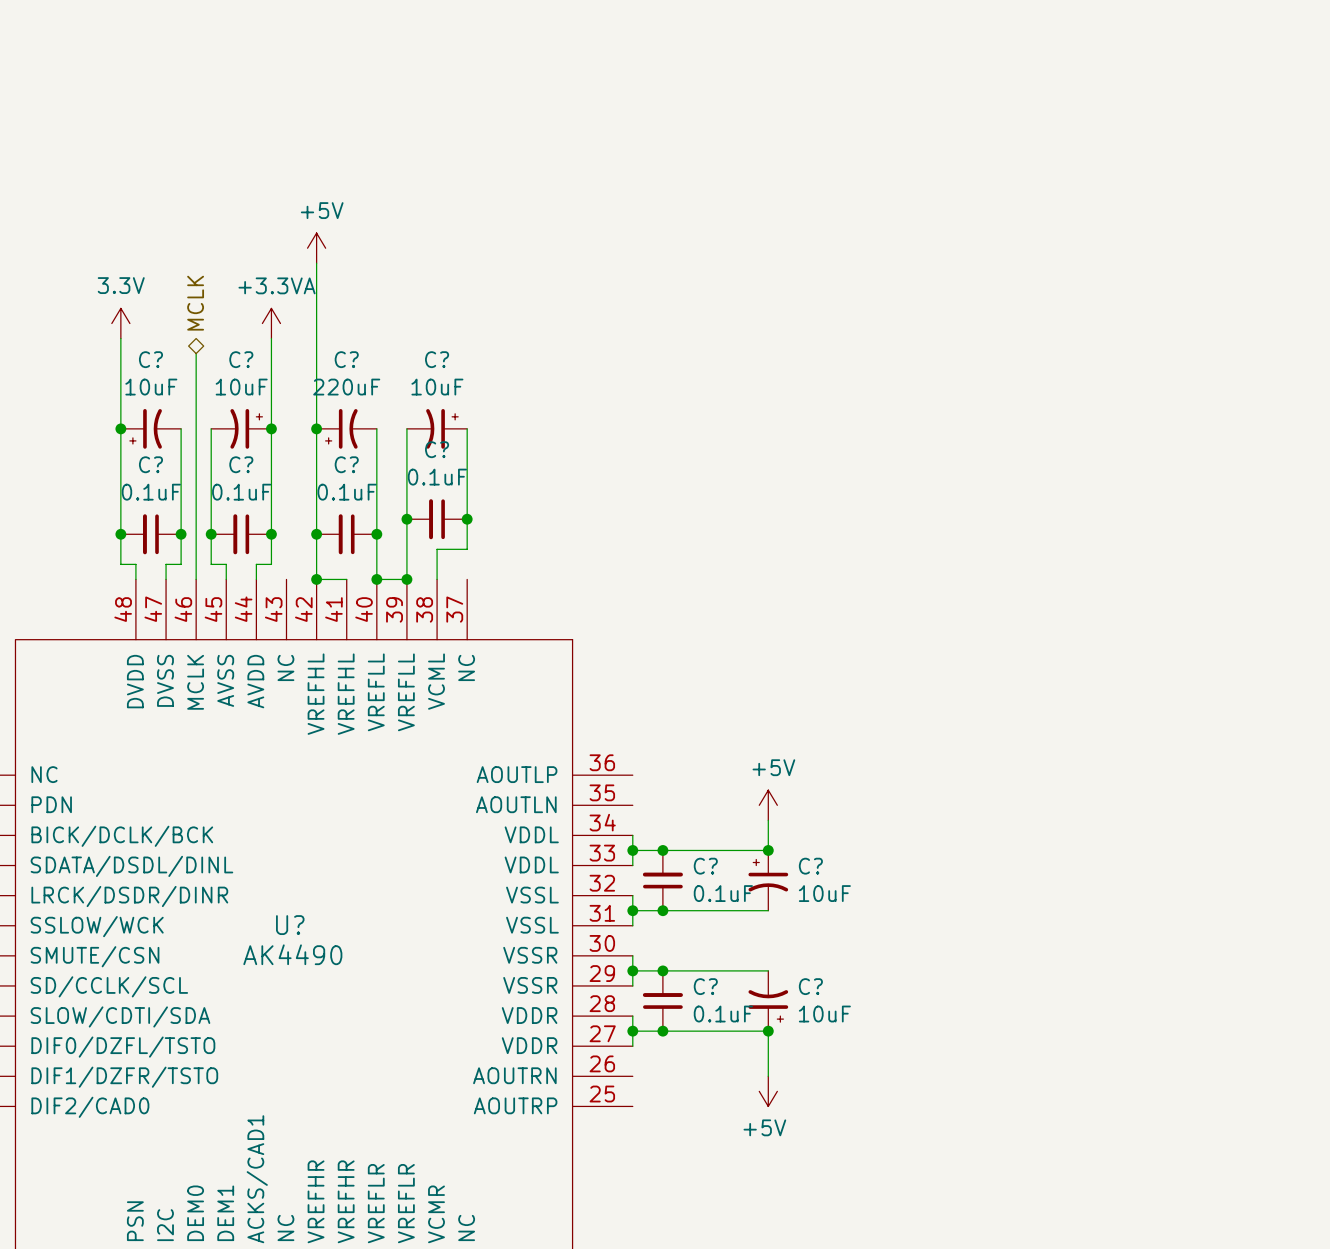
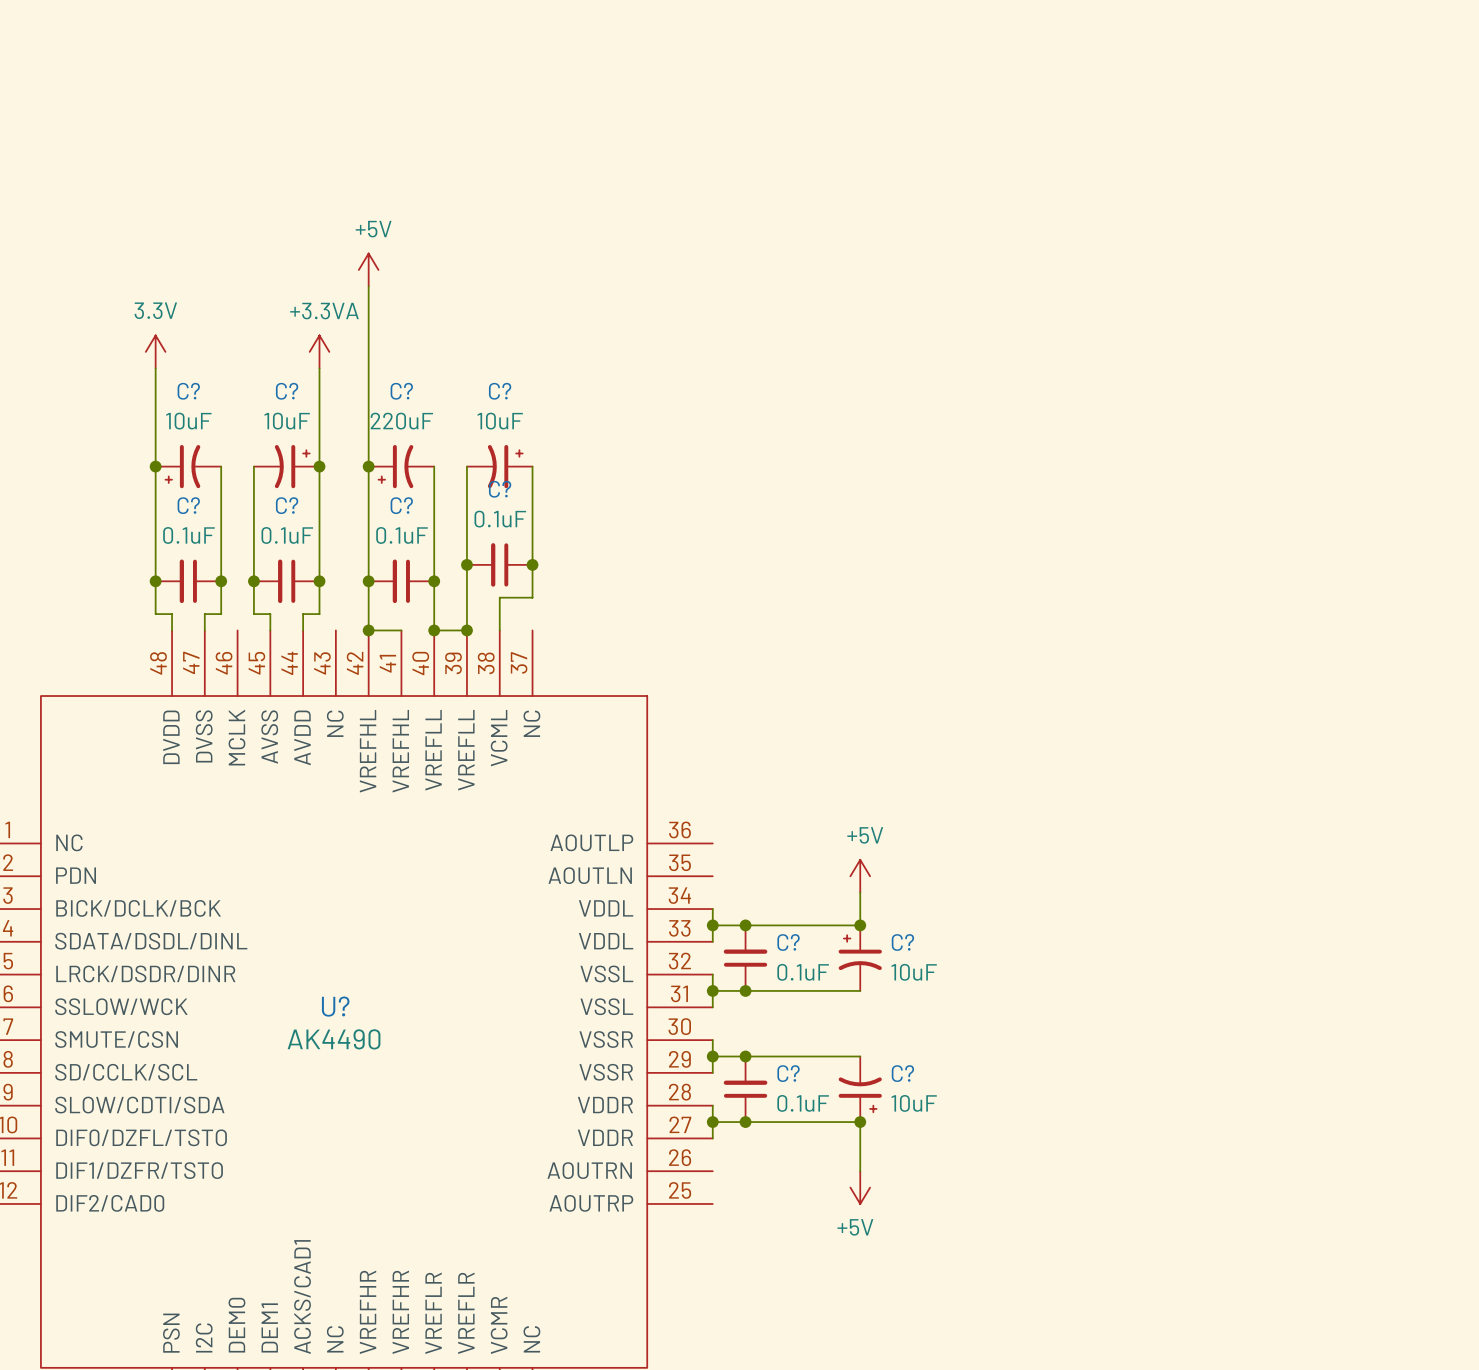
hierarchical label: MCLK (195, 303) -> none
wire: (196, 353) (196, 579) -> none

